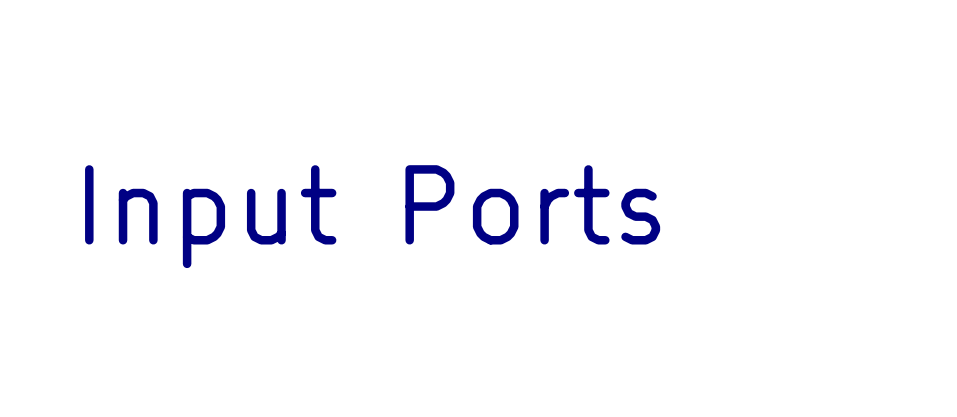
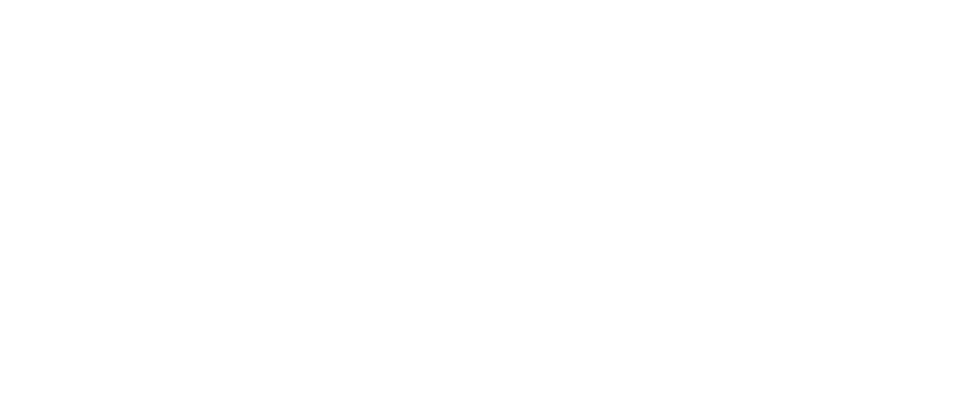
text: Input Ports (372, 216) -> none

